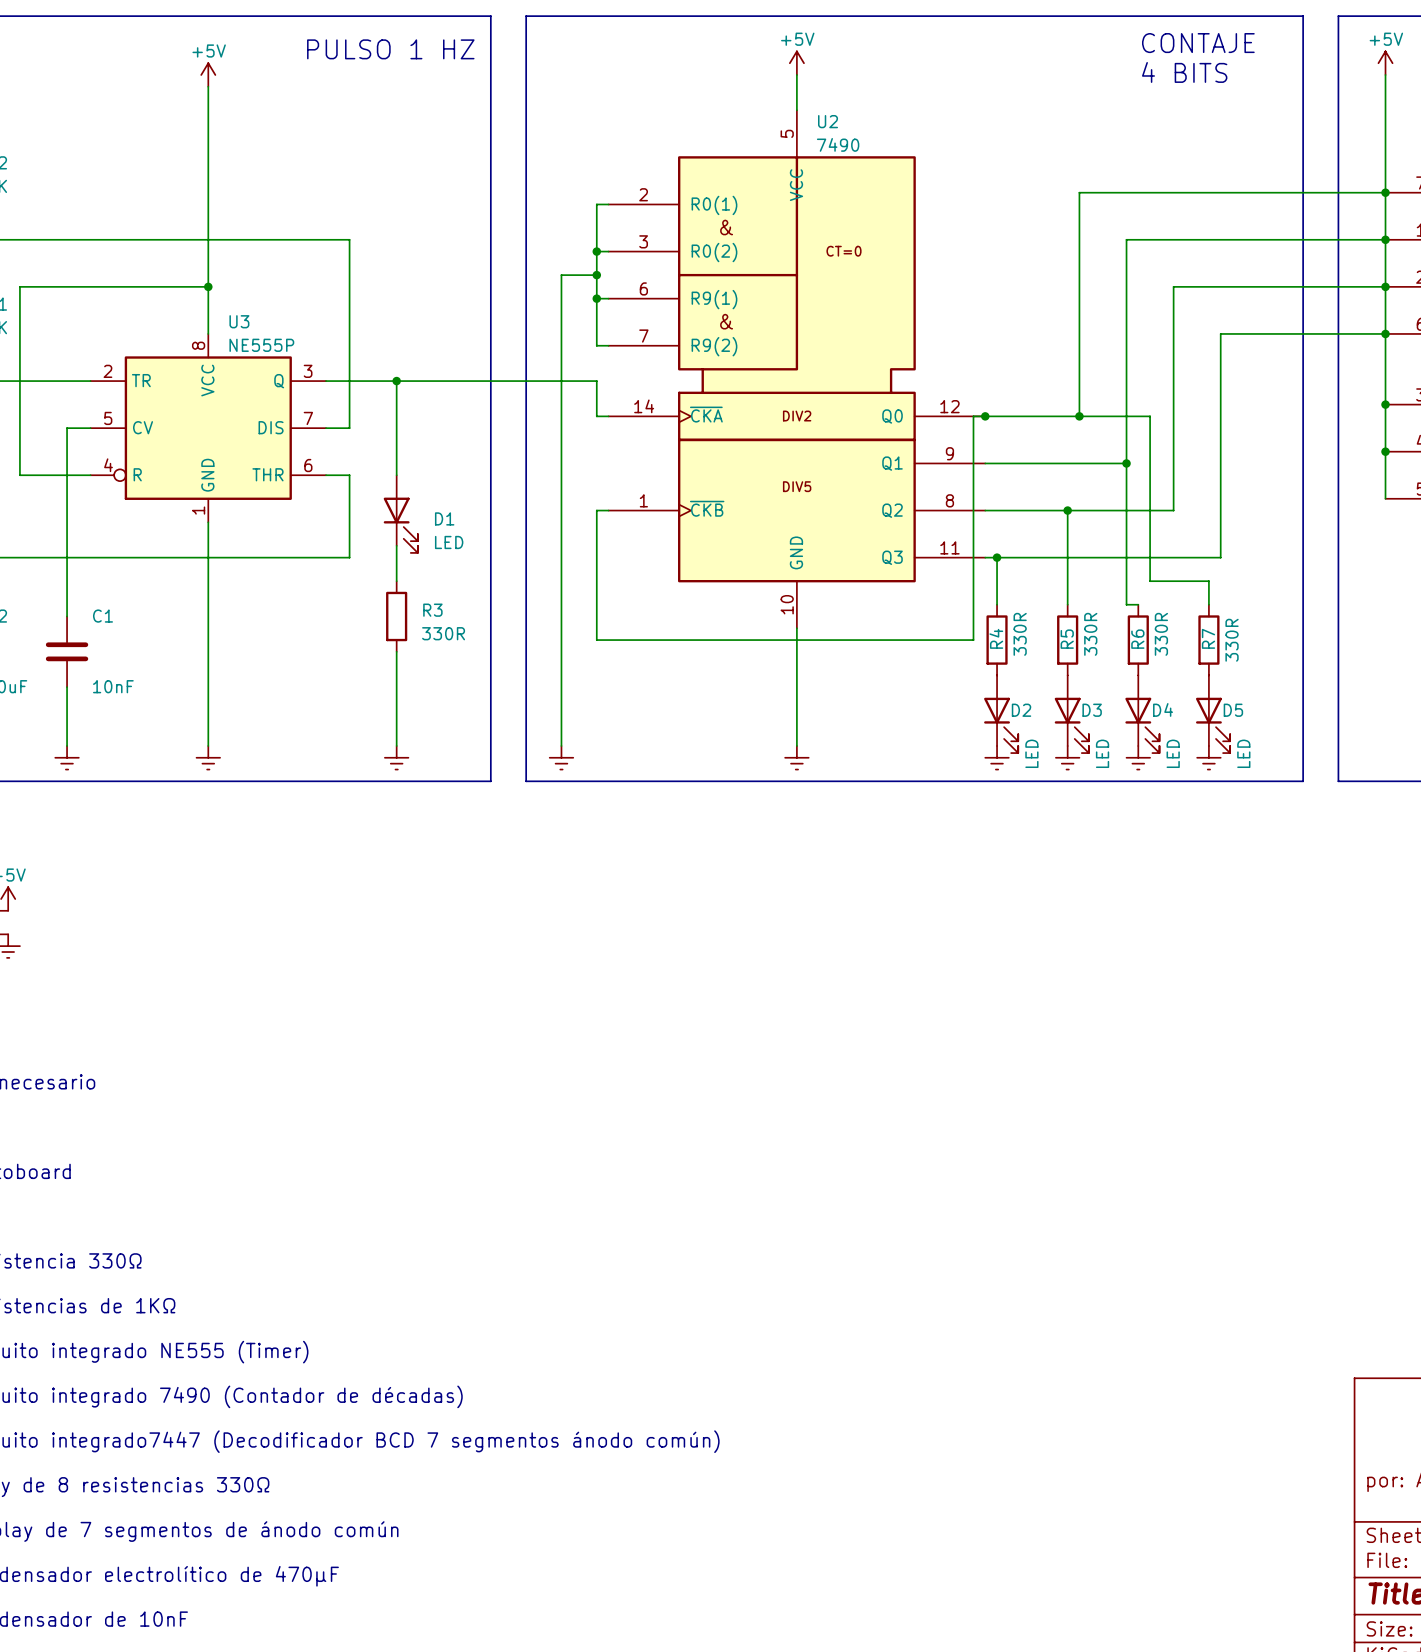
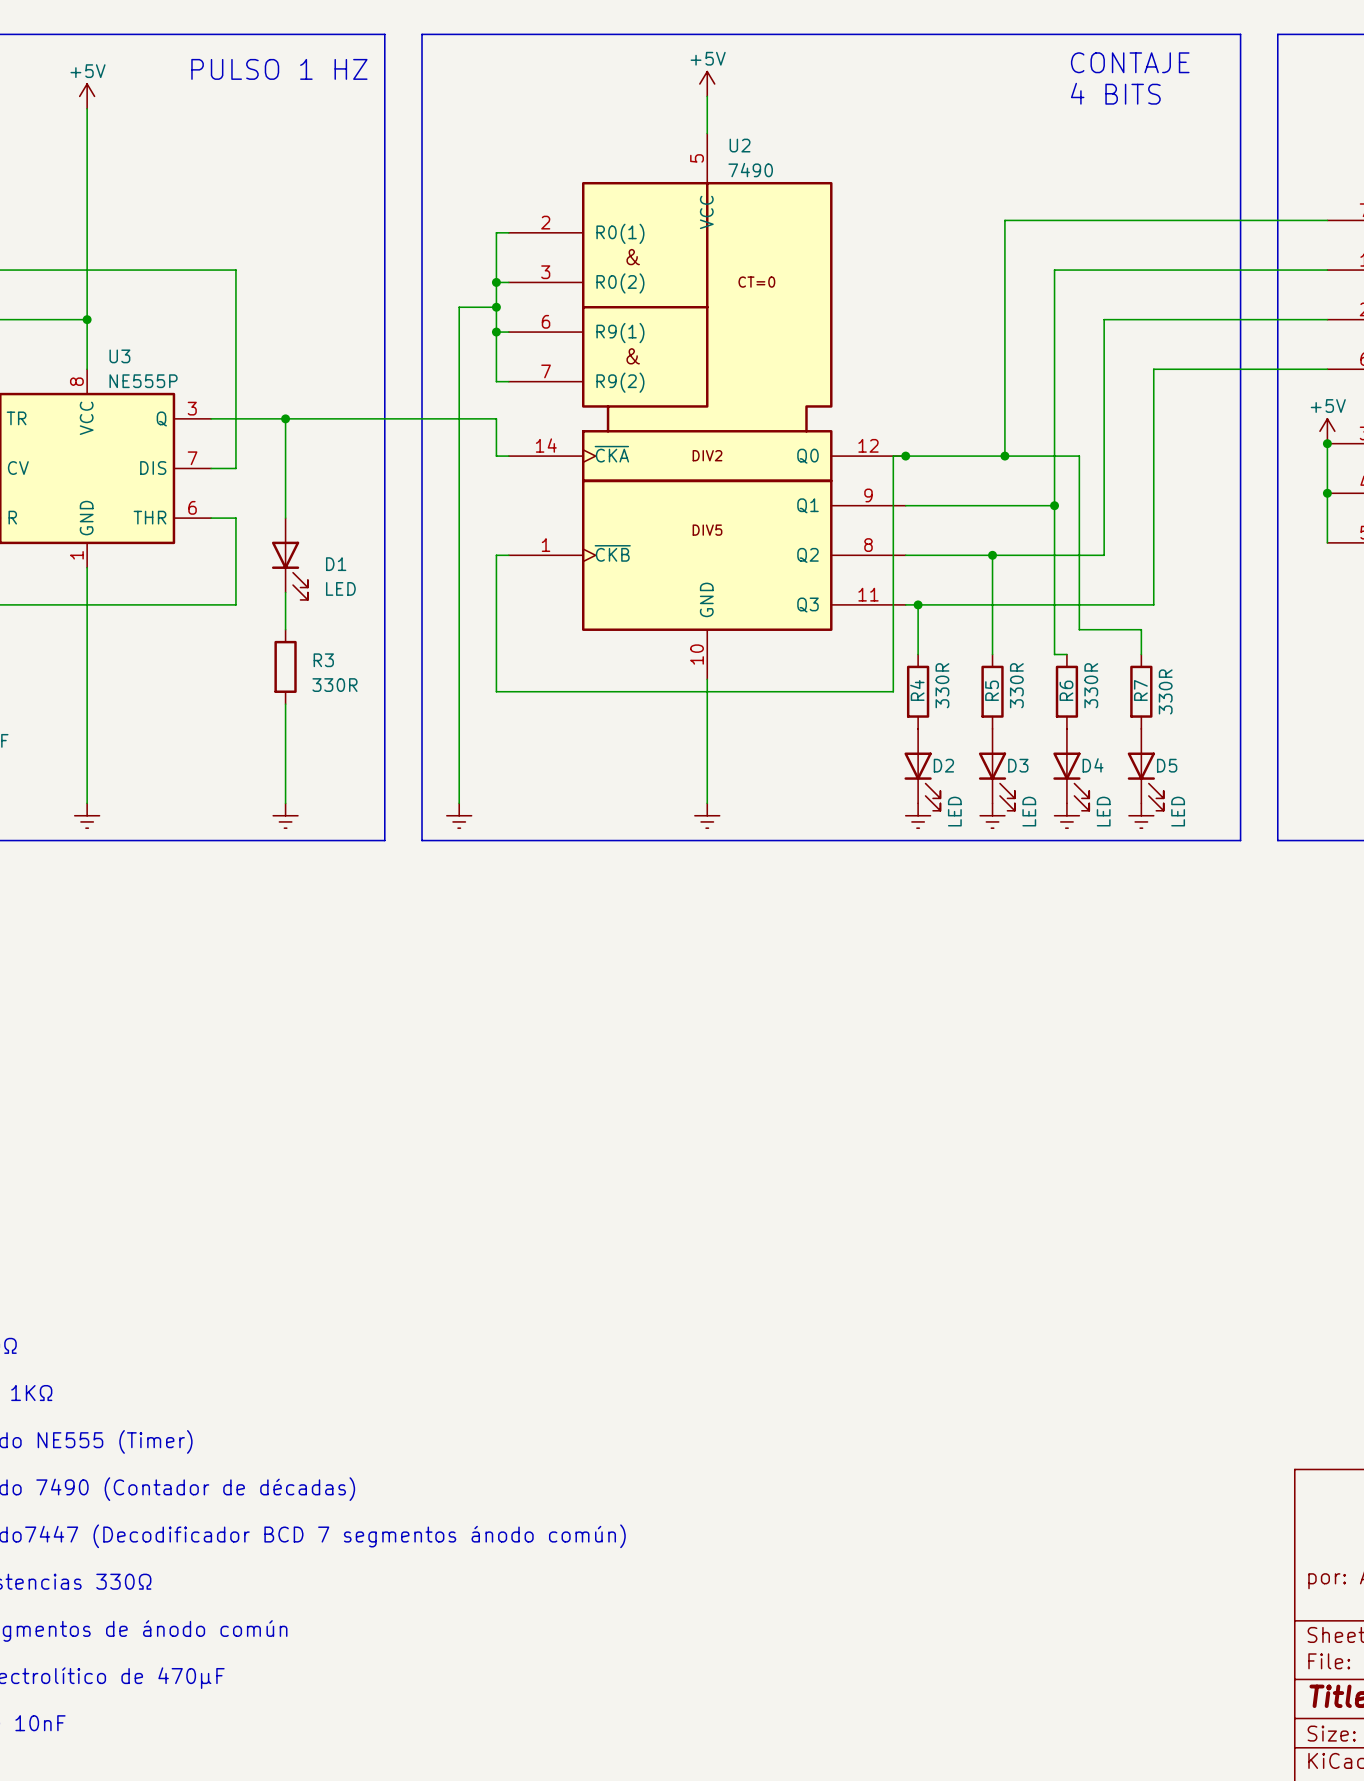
power symbol: +5V (1385, 63) -> none
wire: (1385, 74) (1385, 404) -> none
junction: (1385, 192) -> none
junction: (1385, 239) -> none
junction: (1385, 286) -> none
junction: (1385, 333) -> none
power symbol: none -> +5V (1327, 431)

